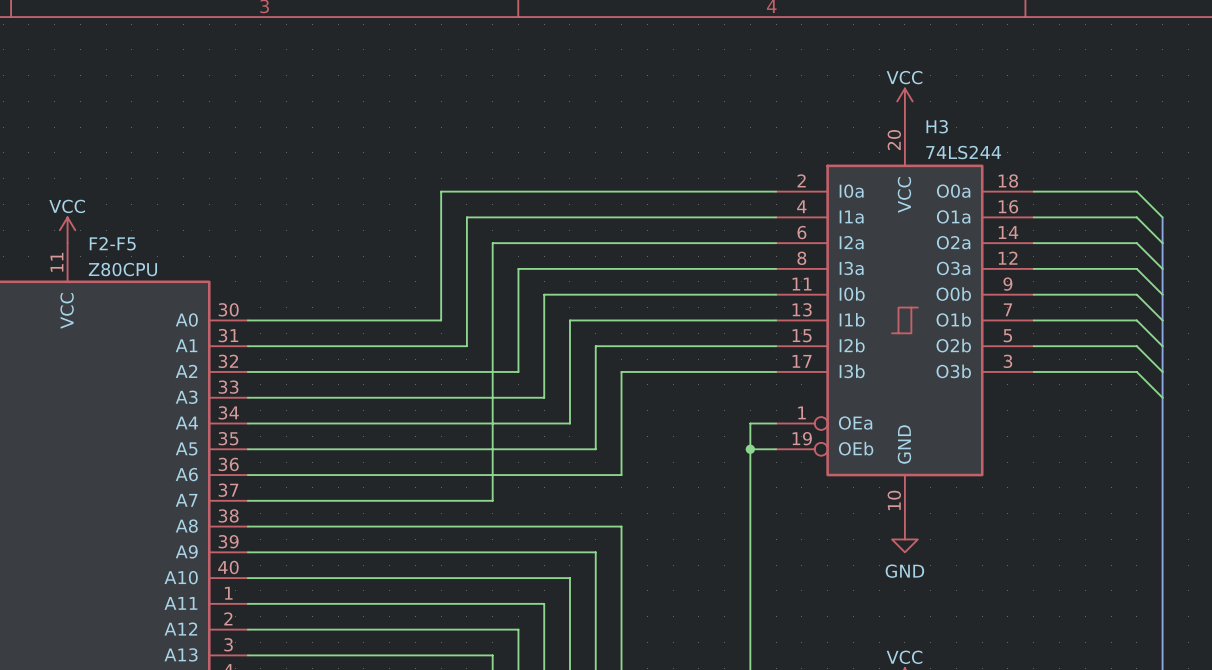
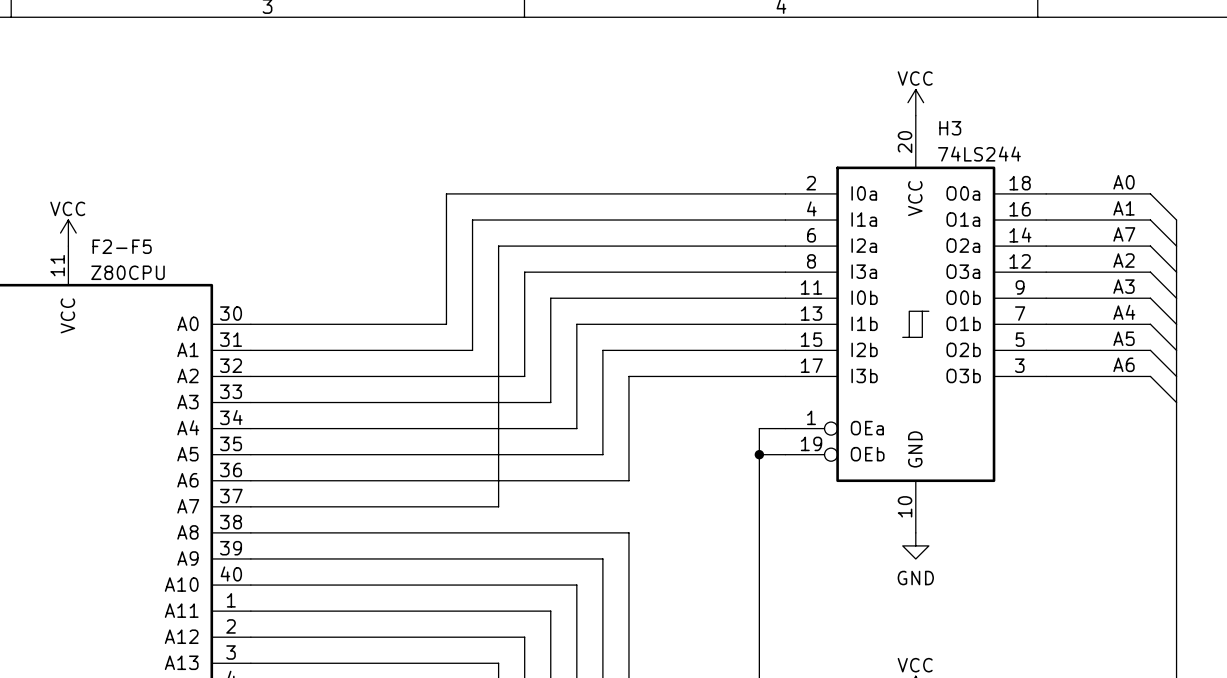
label: none -> A0 (1123, 182)
label: none -> A1 (1123, 208)
label: none -> A7 (1124, 234)
label: none -> A2 (1123, 260)
label: none -> A3 (1123, 286)
label: none -> A4 (1124, 312)
label: none -> A5 (1123, 338)
label: none -> A6 (1123, 364)

